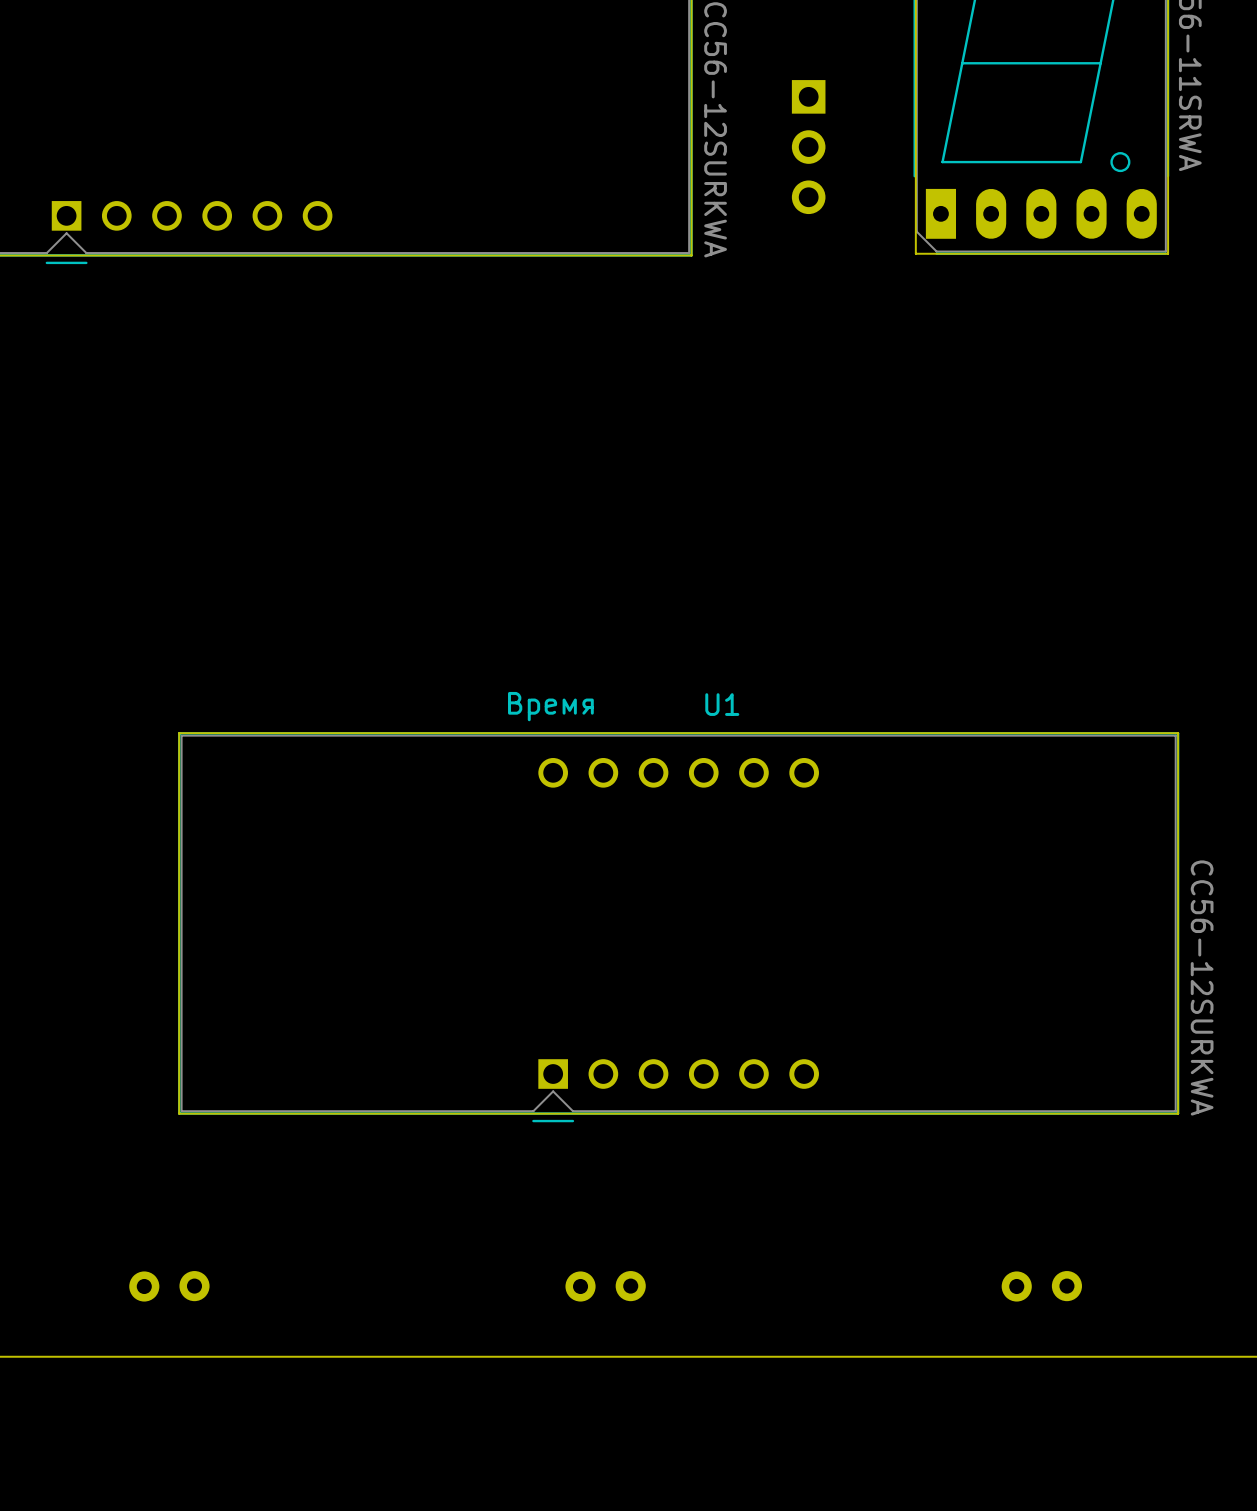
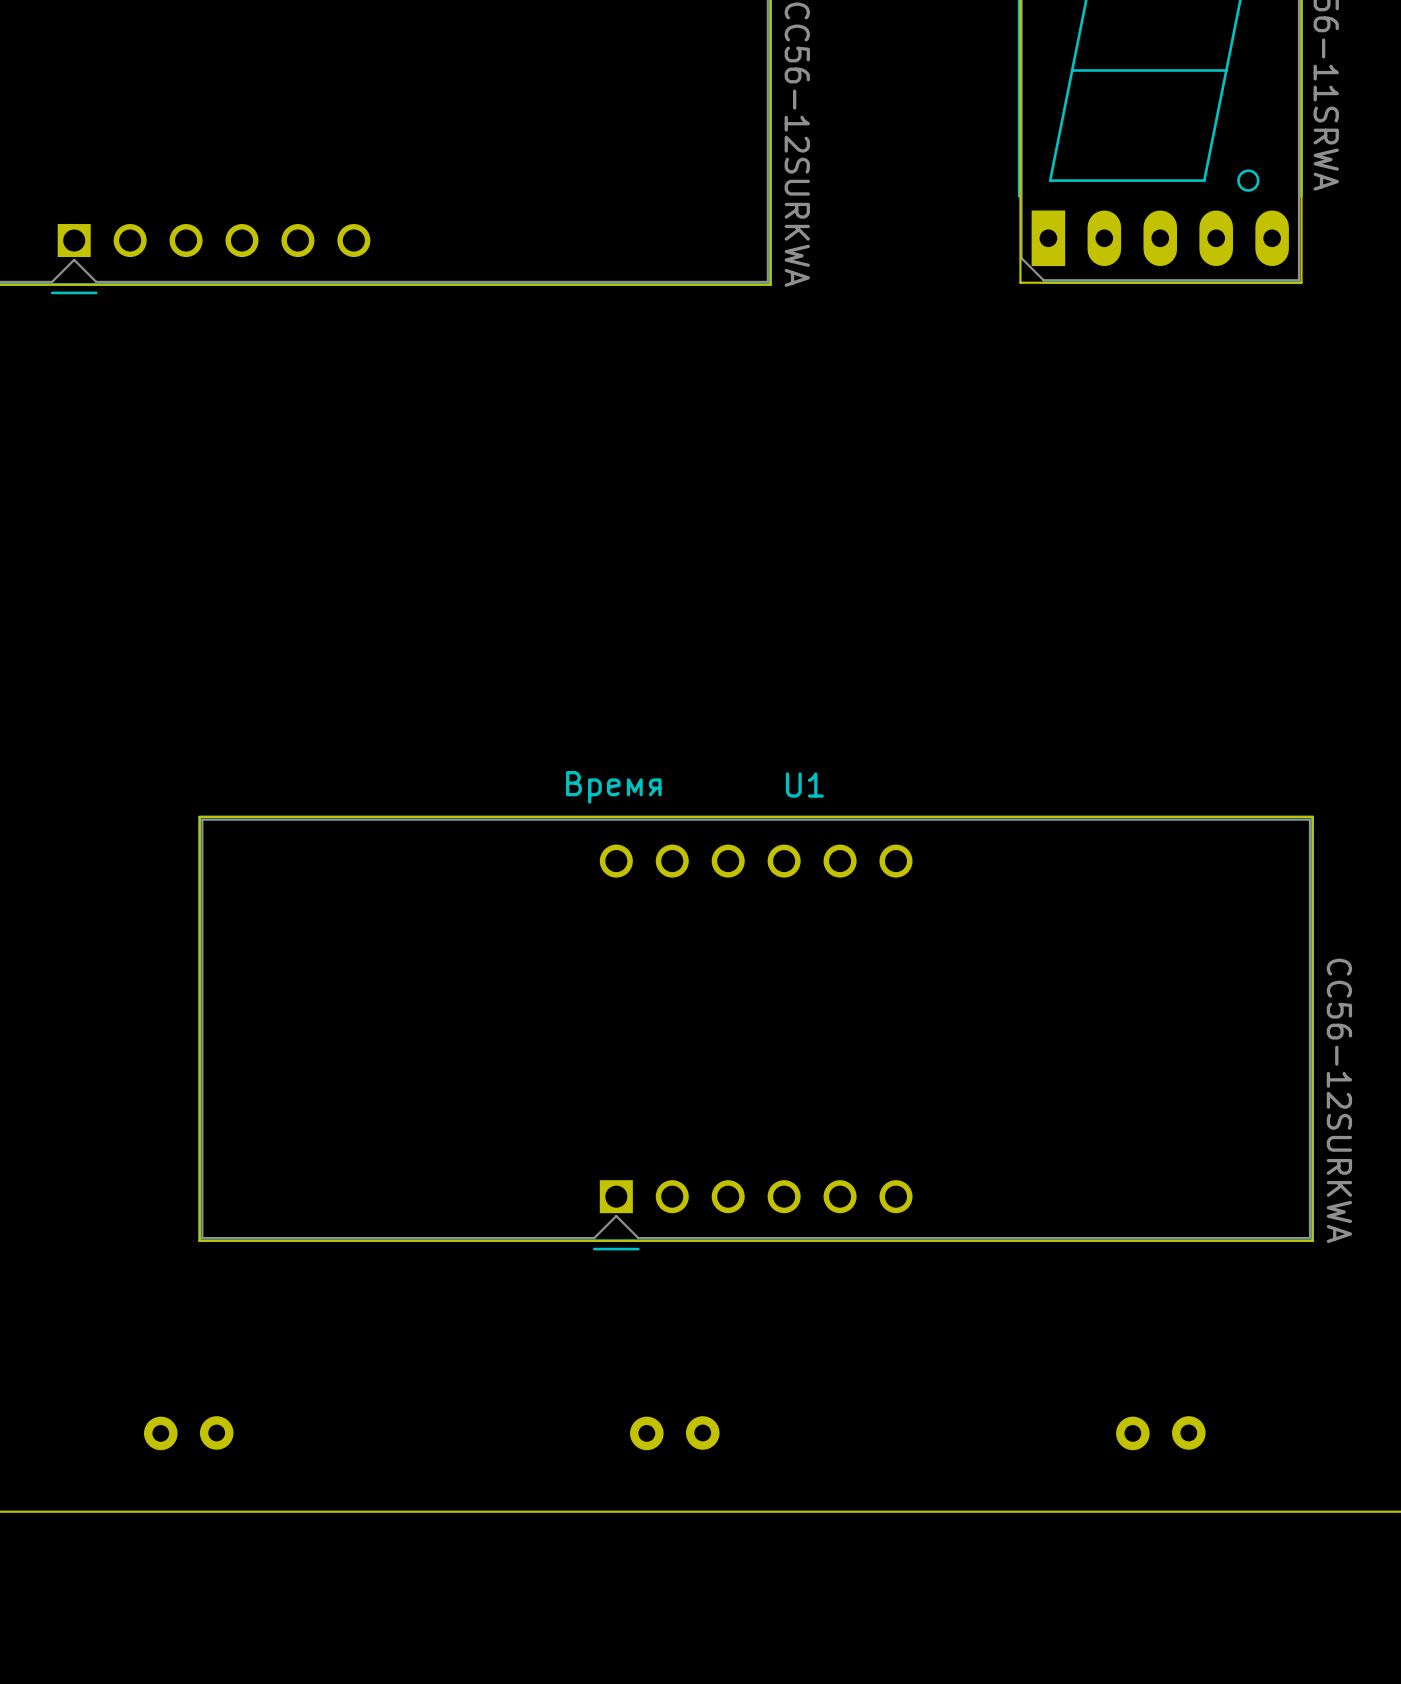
part: (808, 147) -> none

